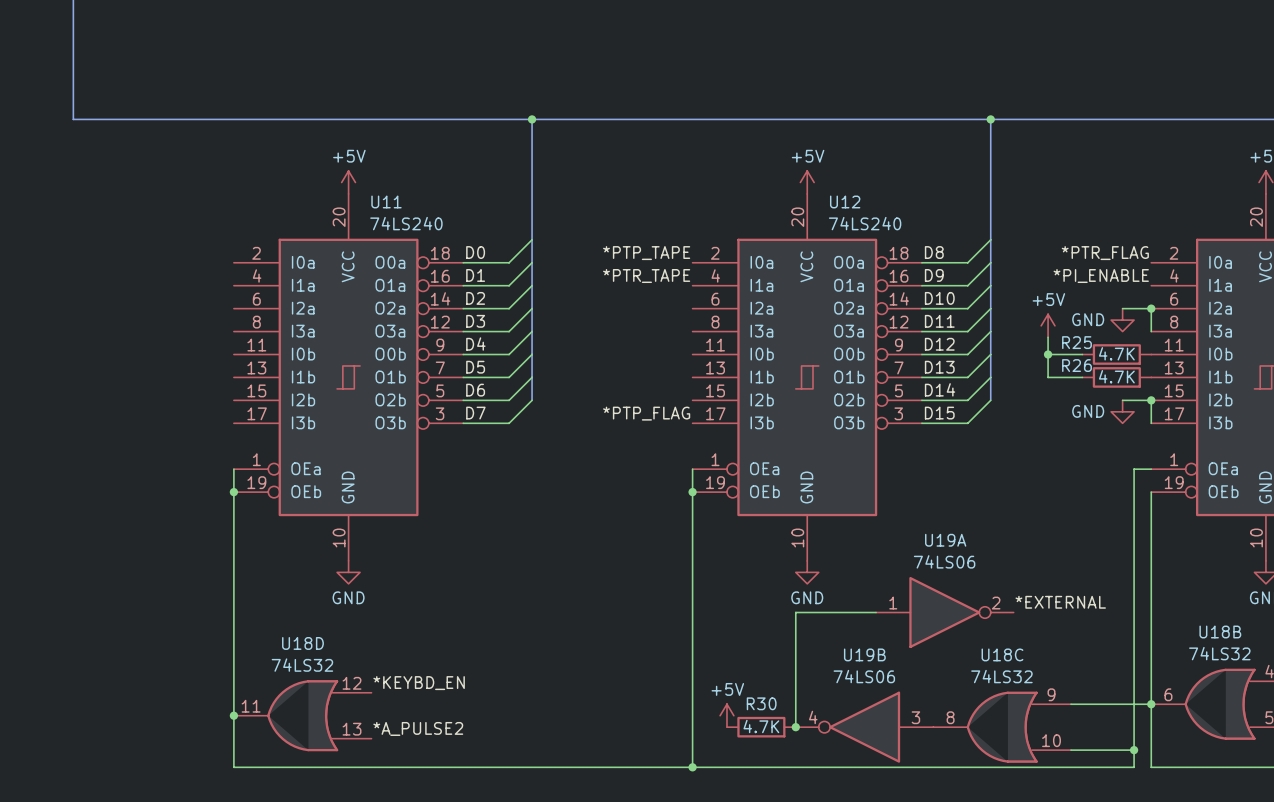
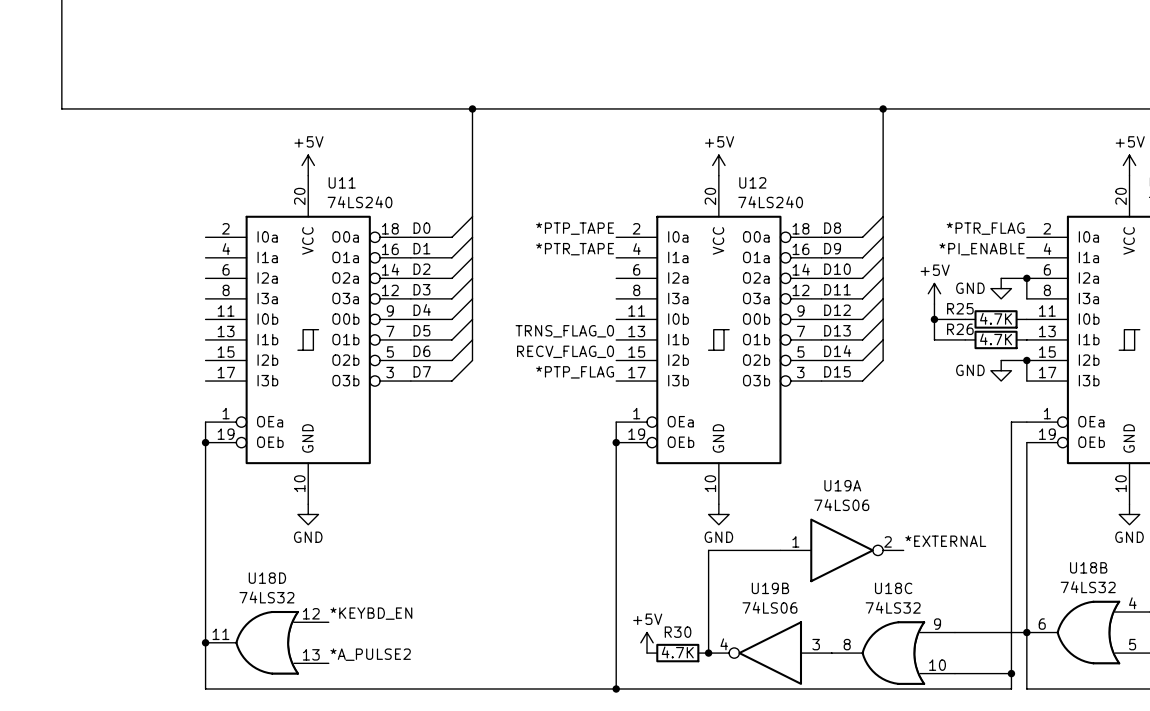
label: none -> TRNS_FLAG_0 (564, 331)
label: none -> RECV_FLAG_0 (565, 351)

